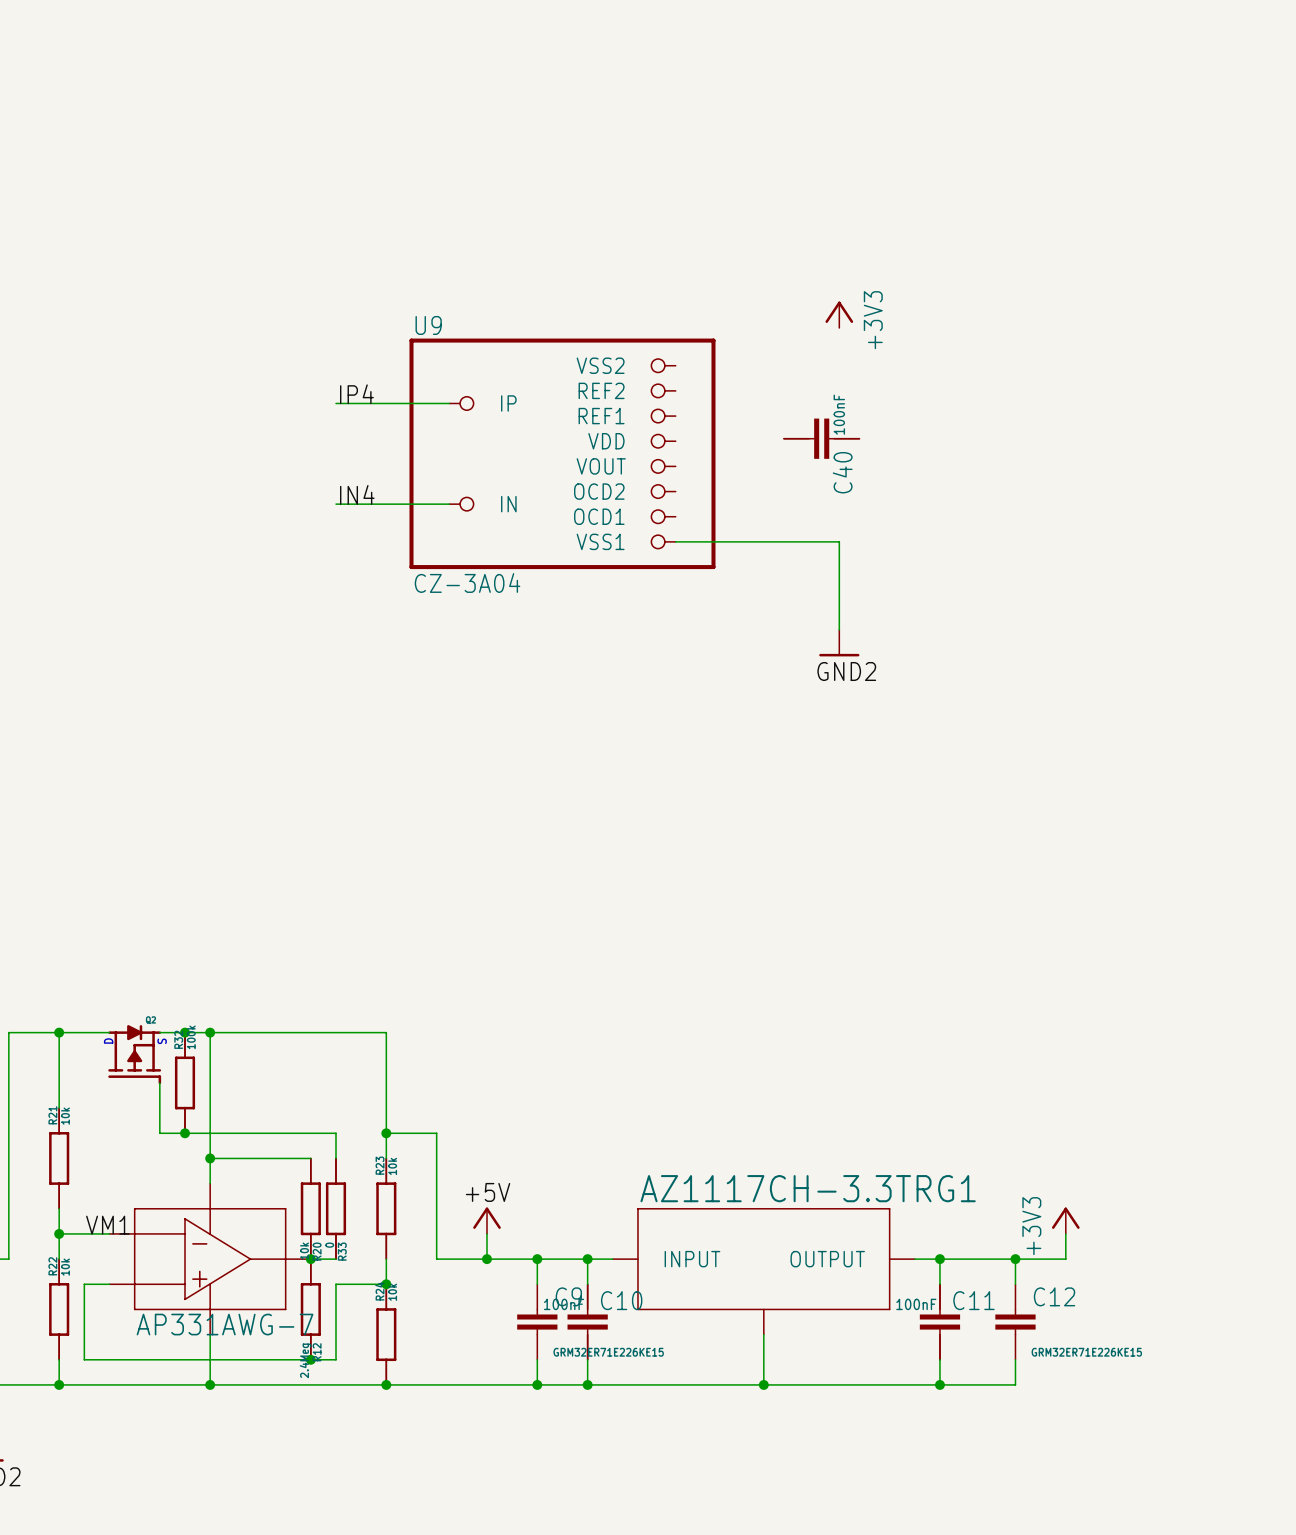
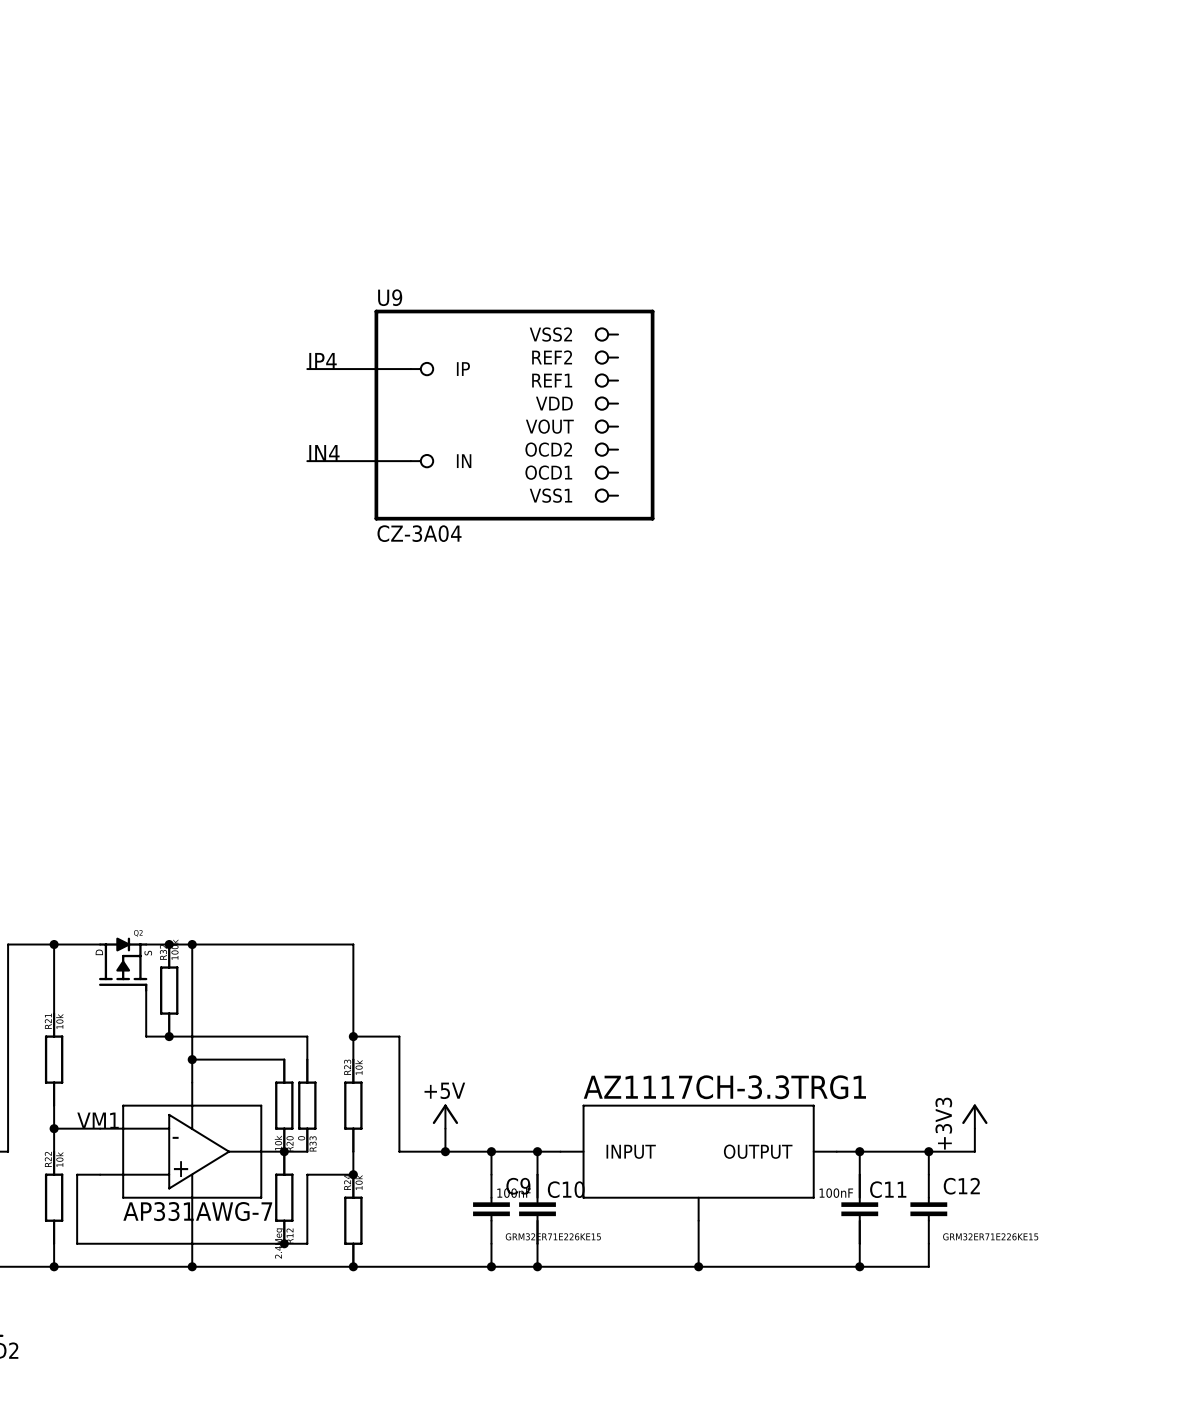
power symbol: +3V3 (839, 314) -> none
C40: (821, 438) -> none
wire: (675, 541) (839, 541) (839, 629) -> none
power symbol: (839, 643) -> none
label: GND2 (846, 671) -> none

